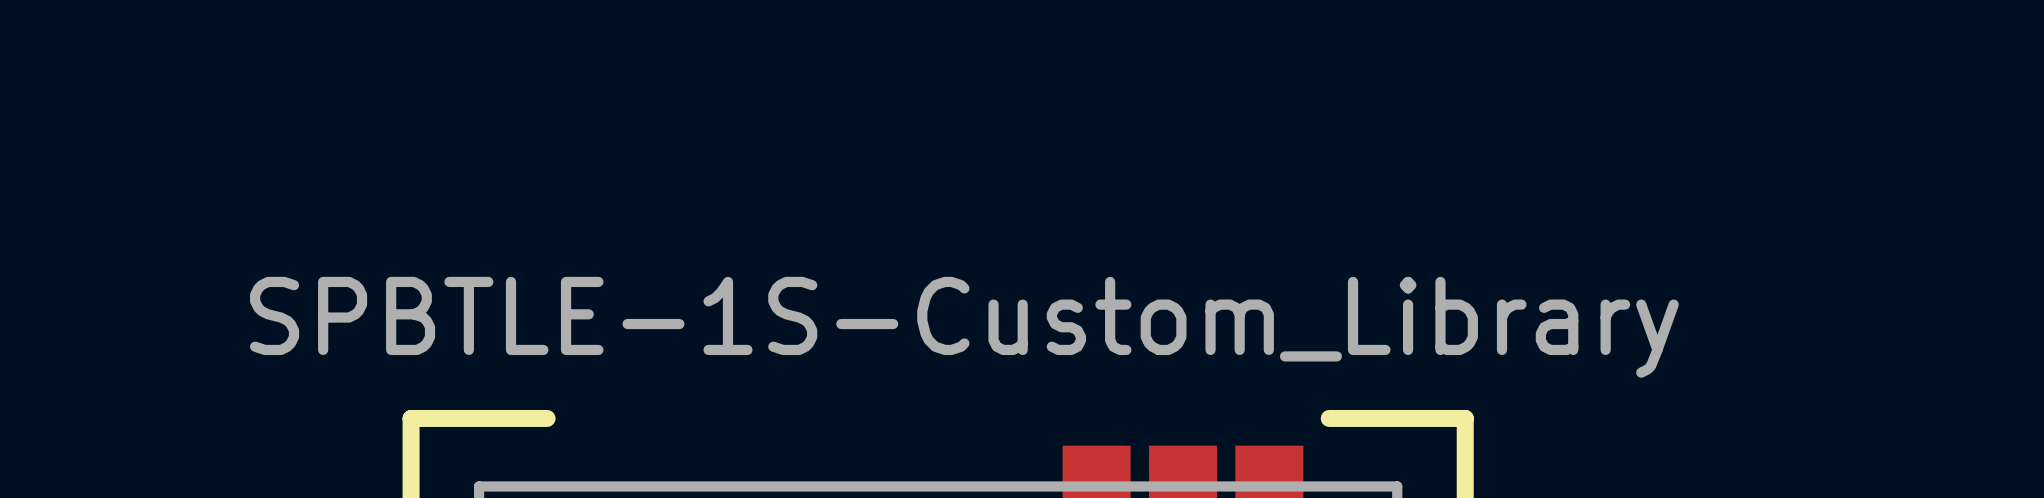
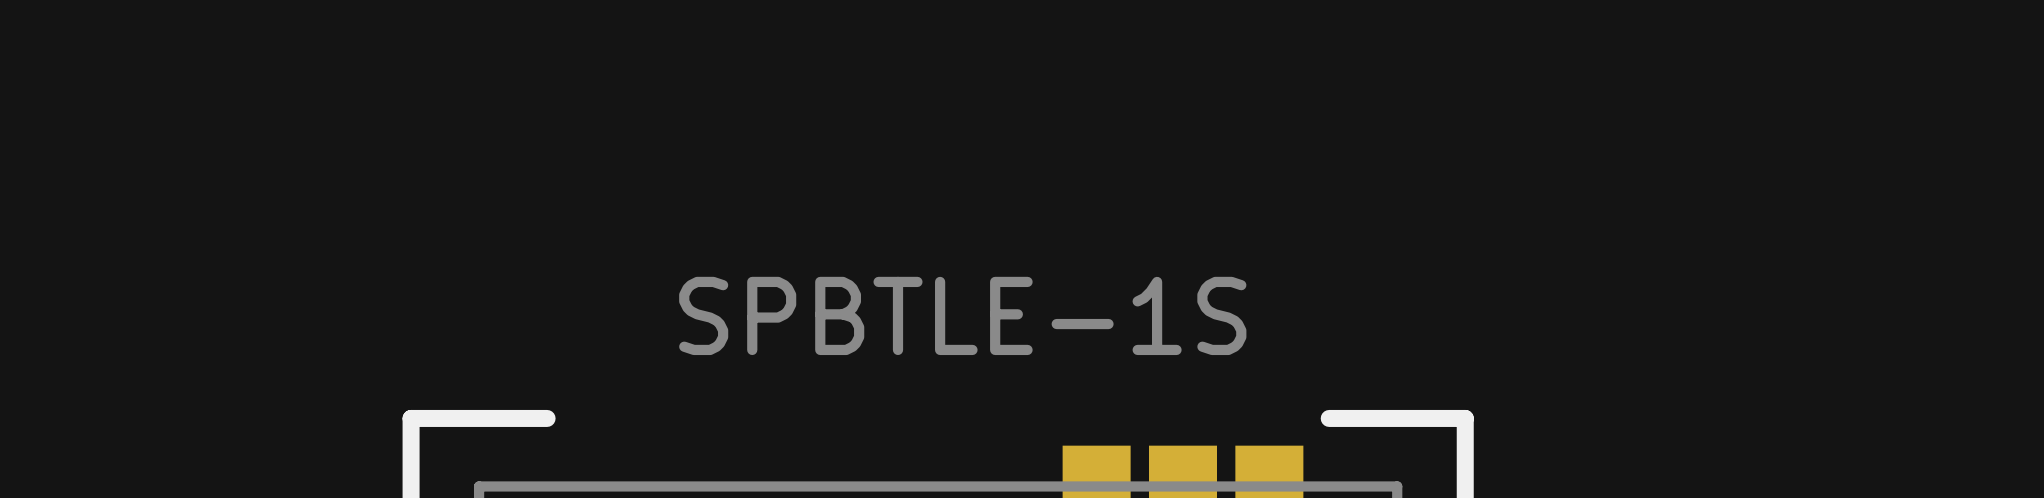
part value: SPBTLE-1S-Custom_Library (964, 327) -> SPBTLE-1S (962, 315)

